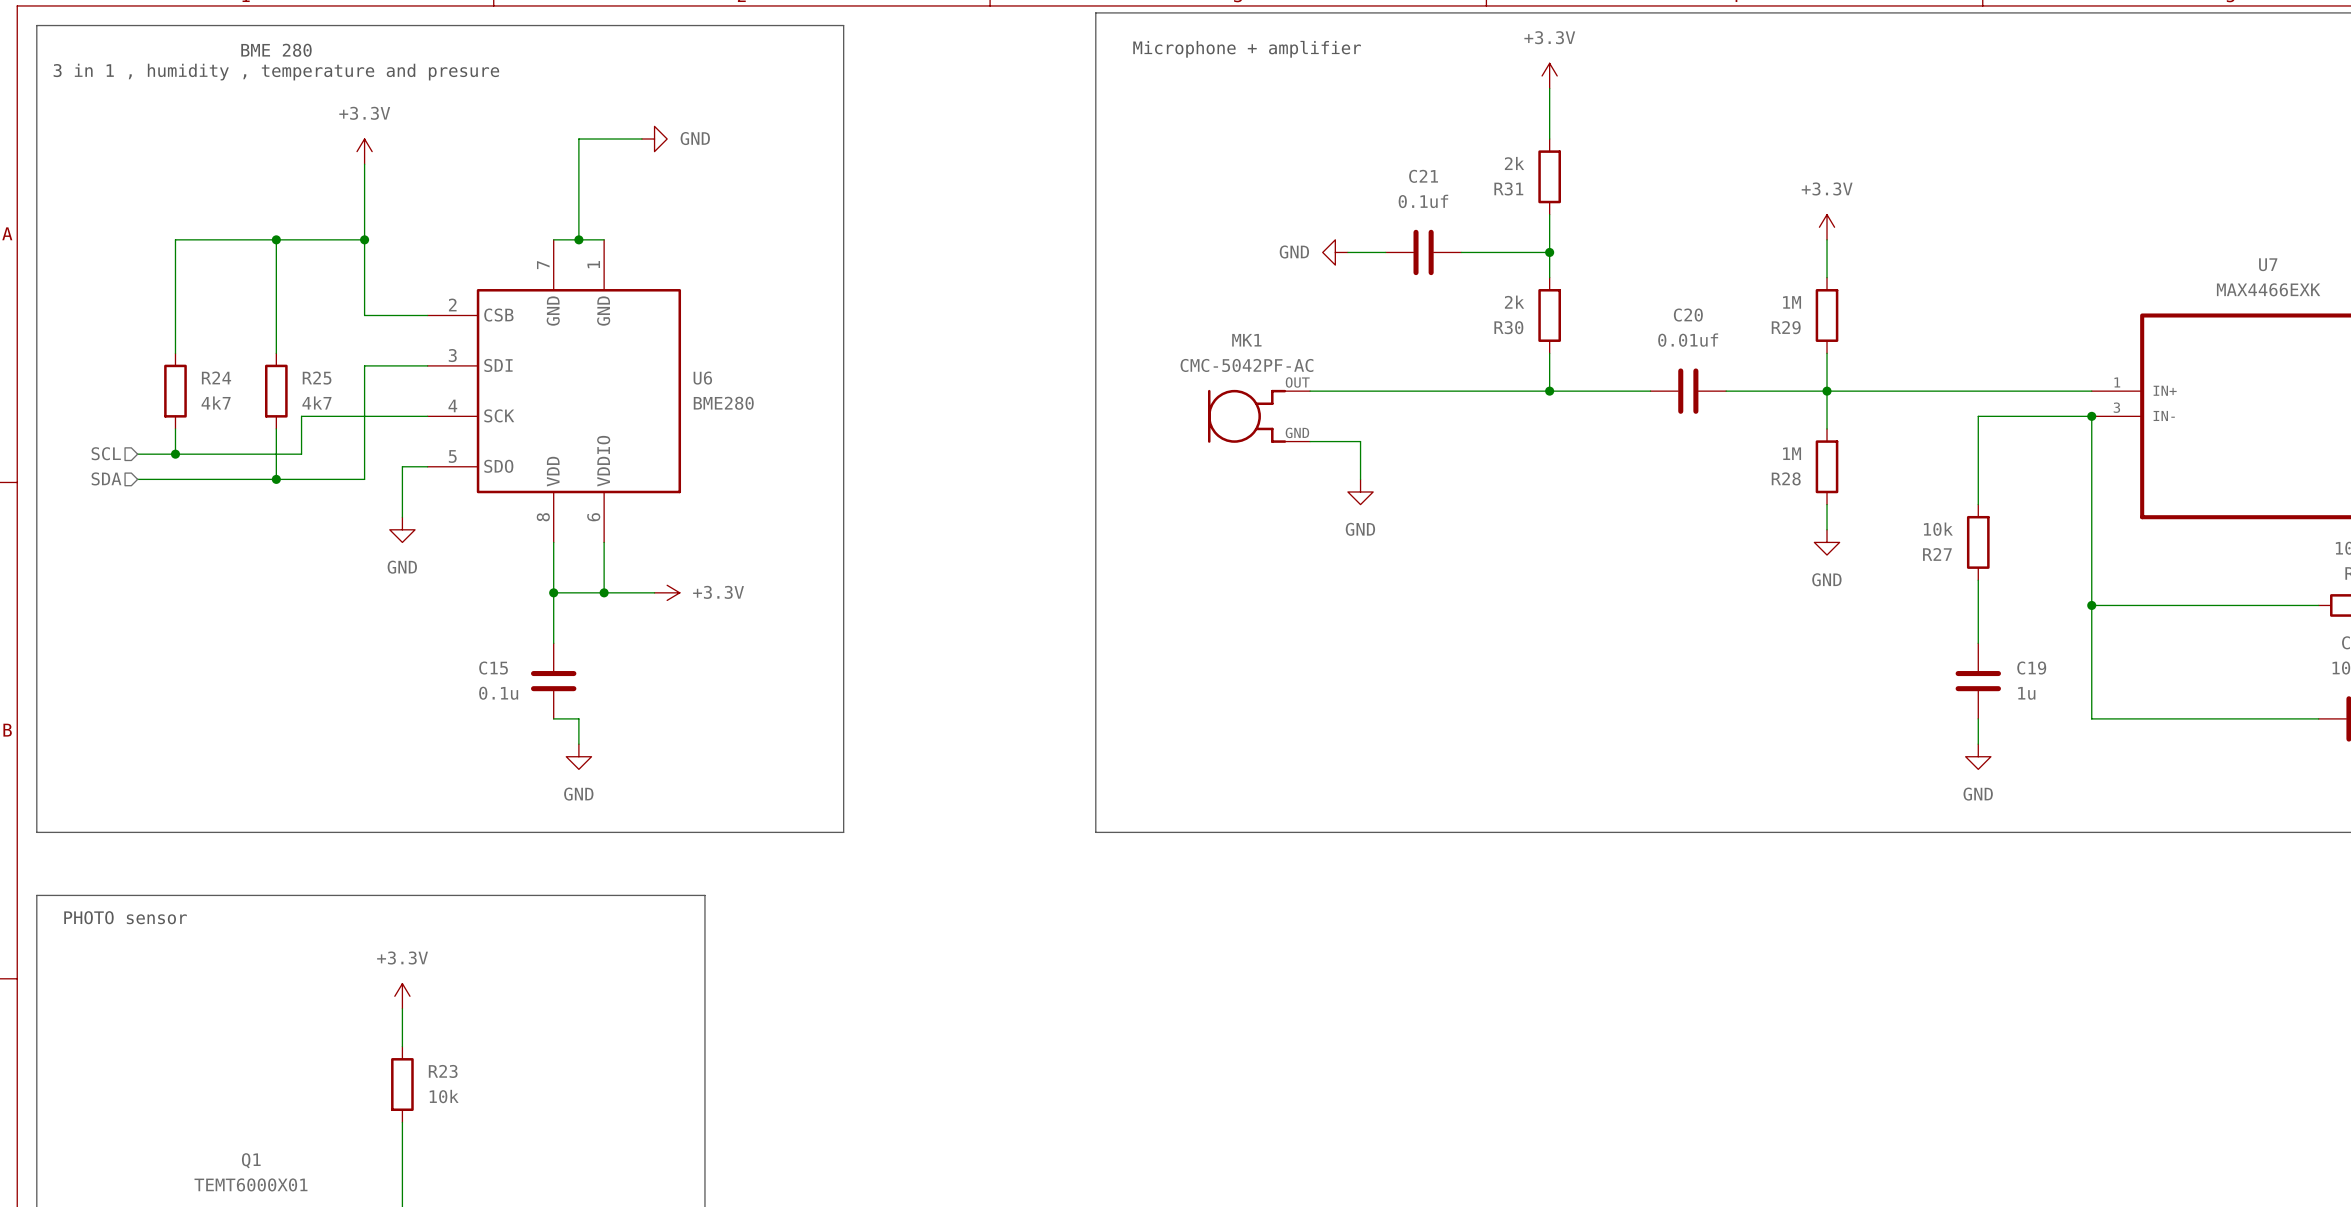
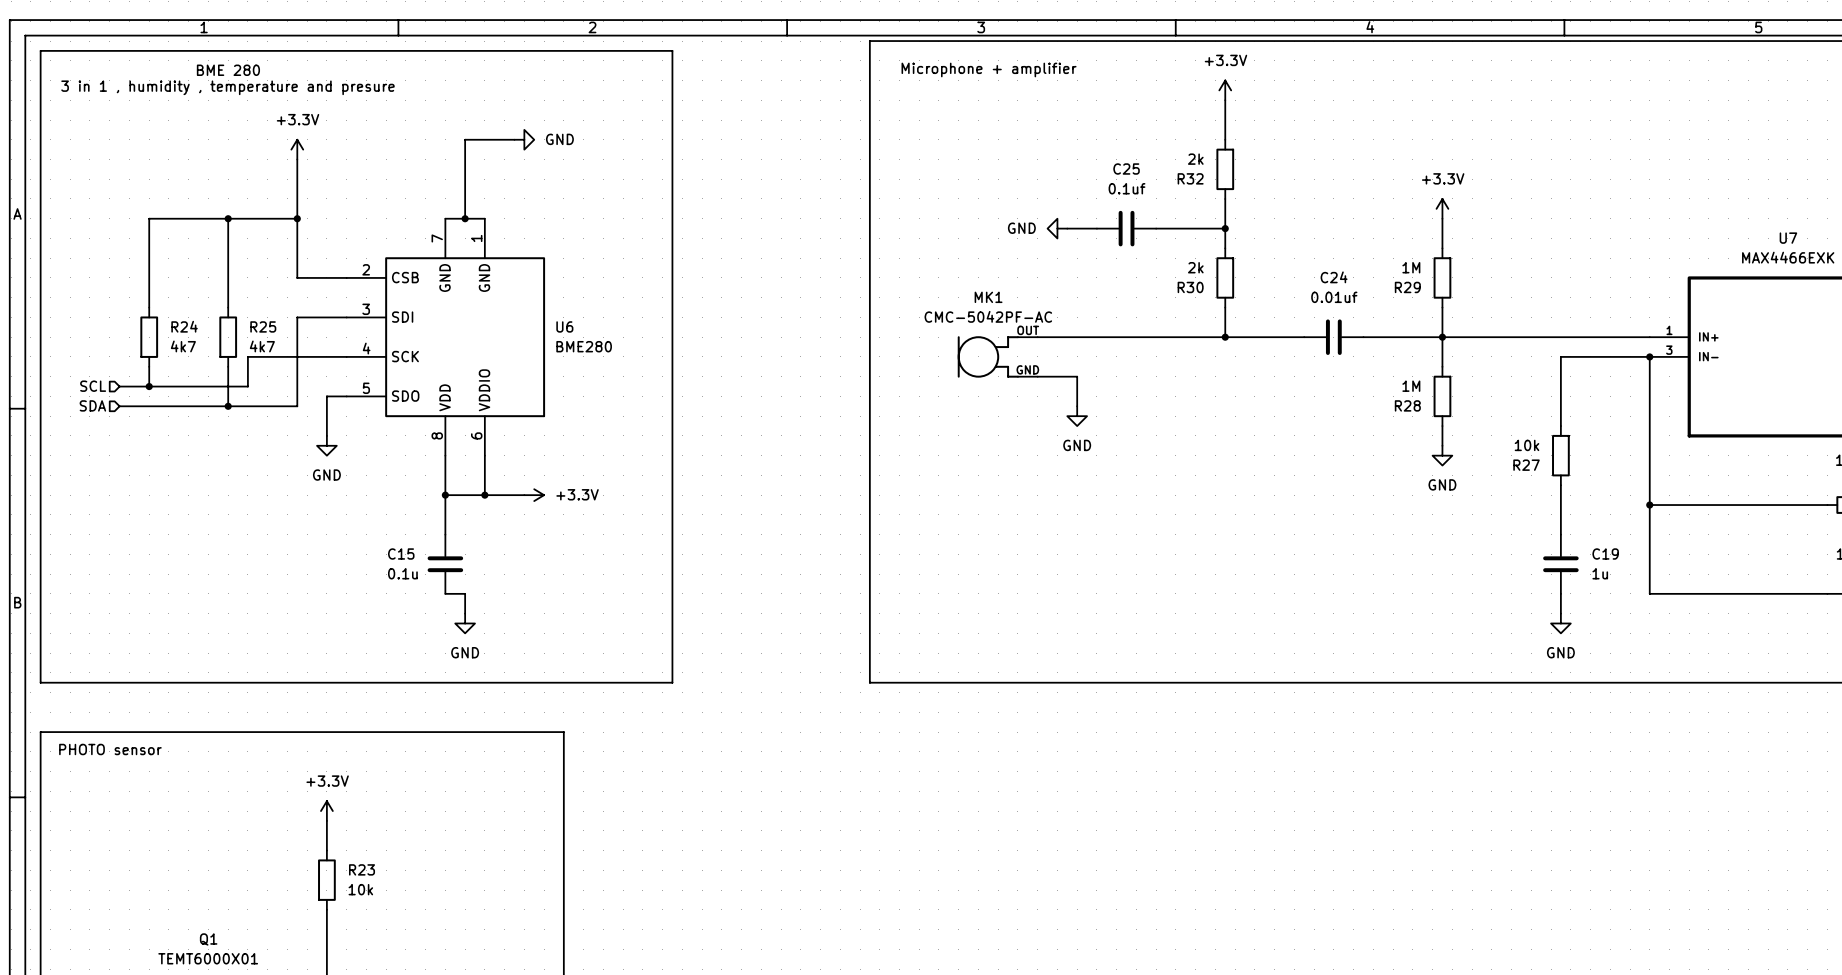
C21 name: C21 (1423, 176) -> C25 (1126, 169)
R31 name: R31 (1508, 188) -> R32 (1190, 178)
C20 name: C20 (1688, 315) -> C24 (1334, 277)

